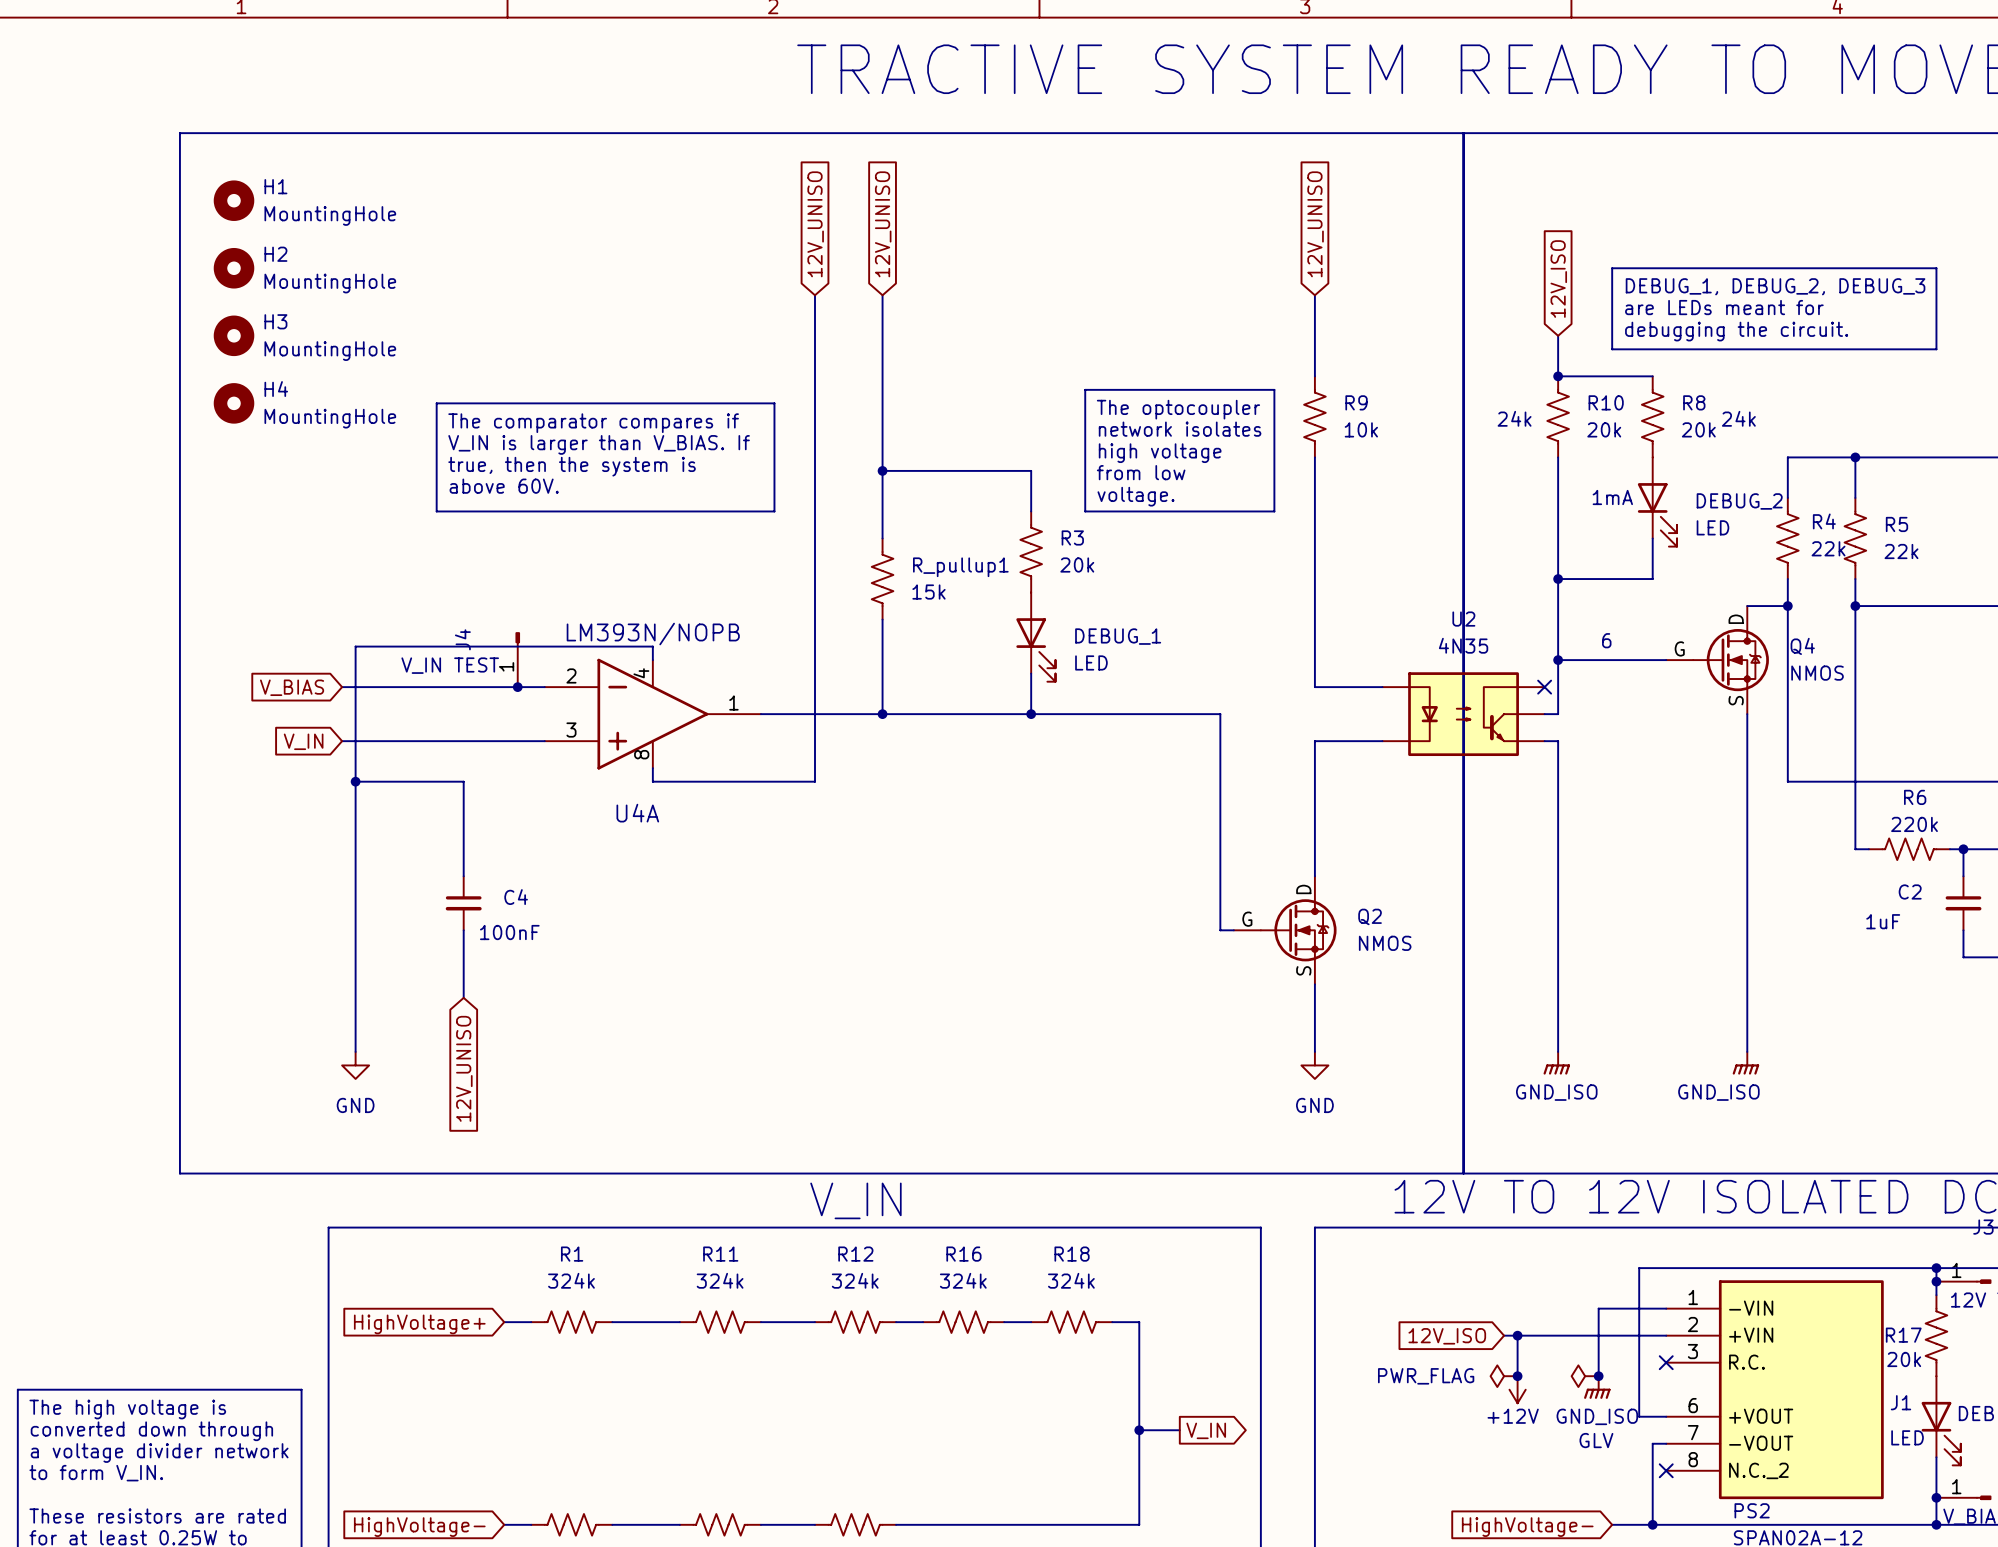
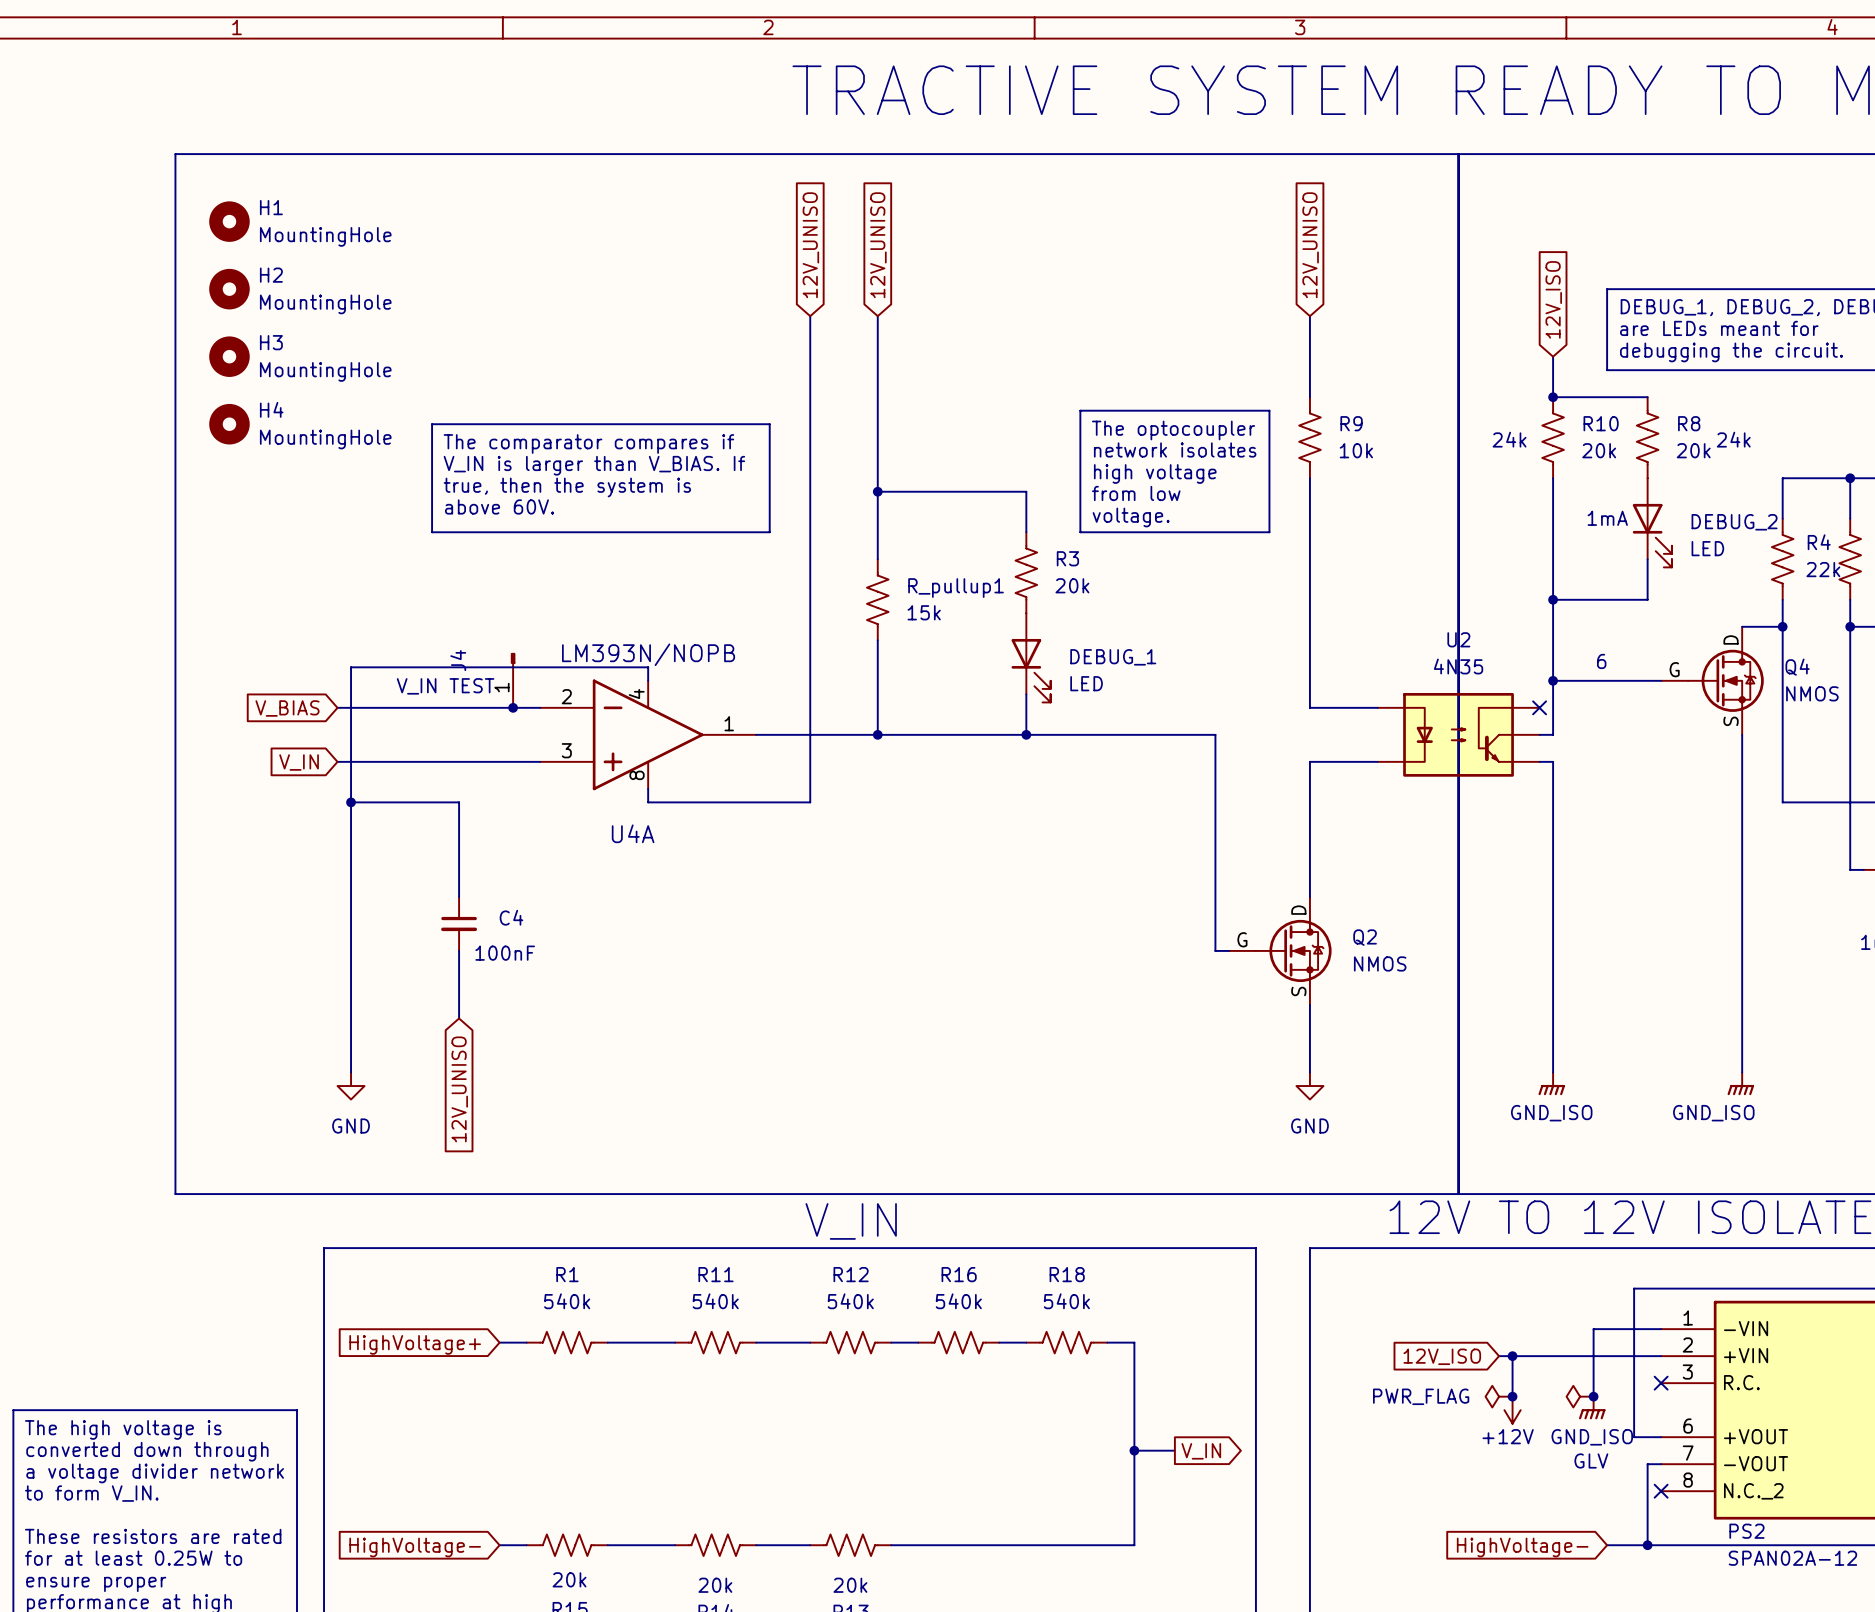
R1 value: 324k (571, 1280) -> 540k (567, 1301)
R11 value: 324k (720, 1280) -> 540k (715, 1301)
R12 value: 324k (855, 1280) -> 540k (850, 1301)
R16 value: 324k (963, 1280) -> 540k (958, 1301)
R18 value: 324k (1071, 1280) -> 540k (1066, 1301)

